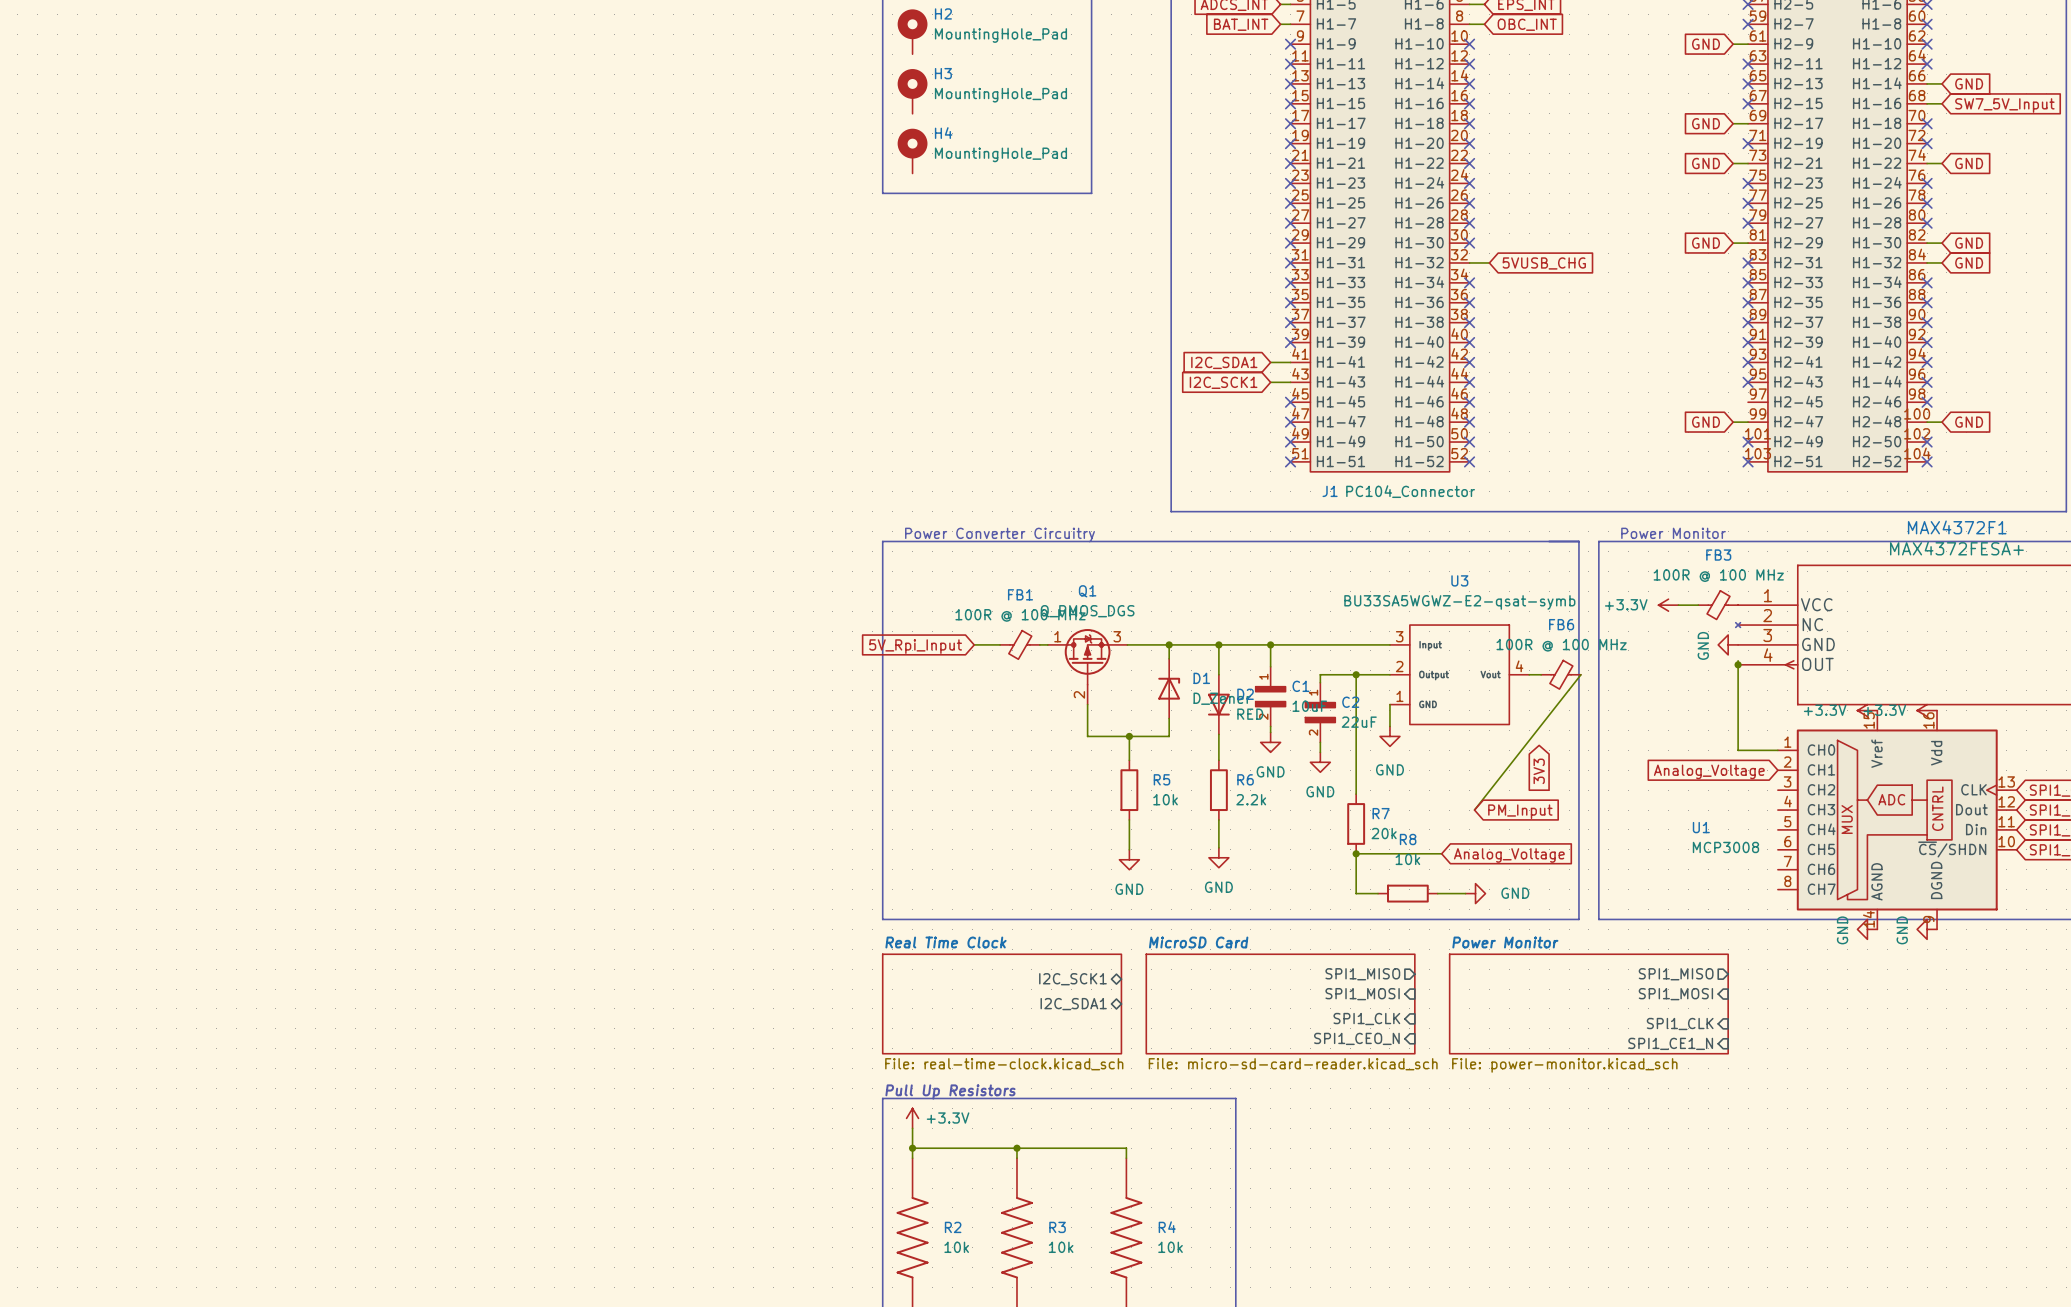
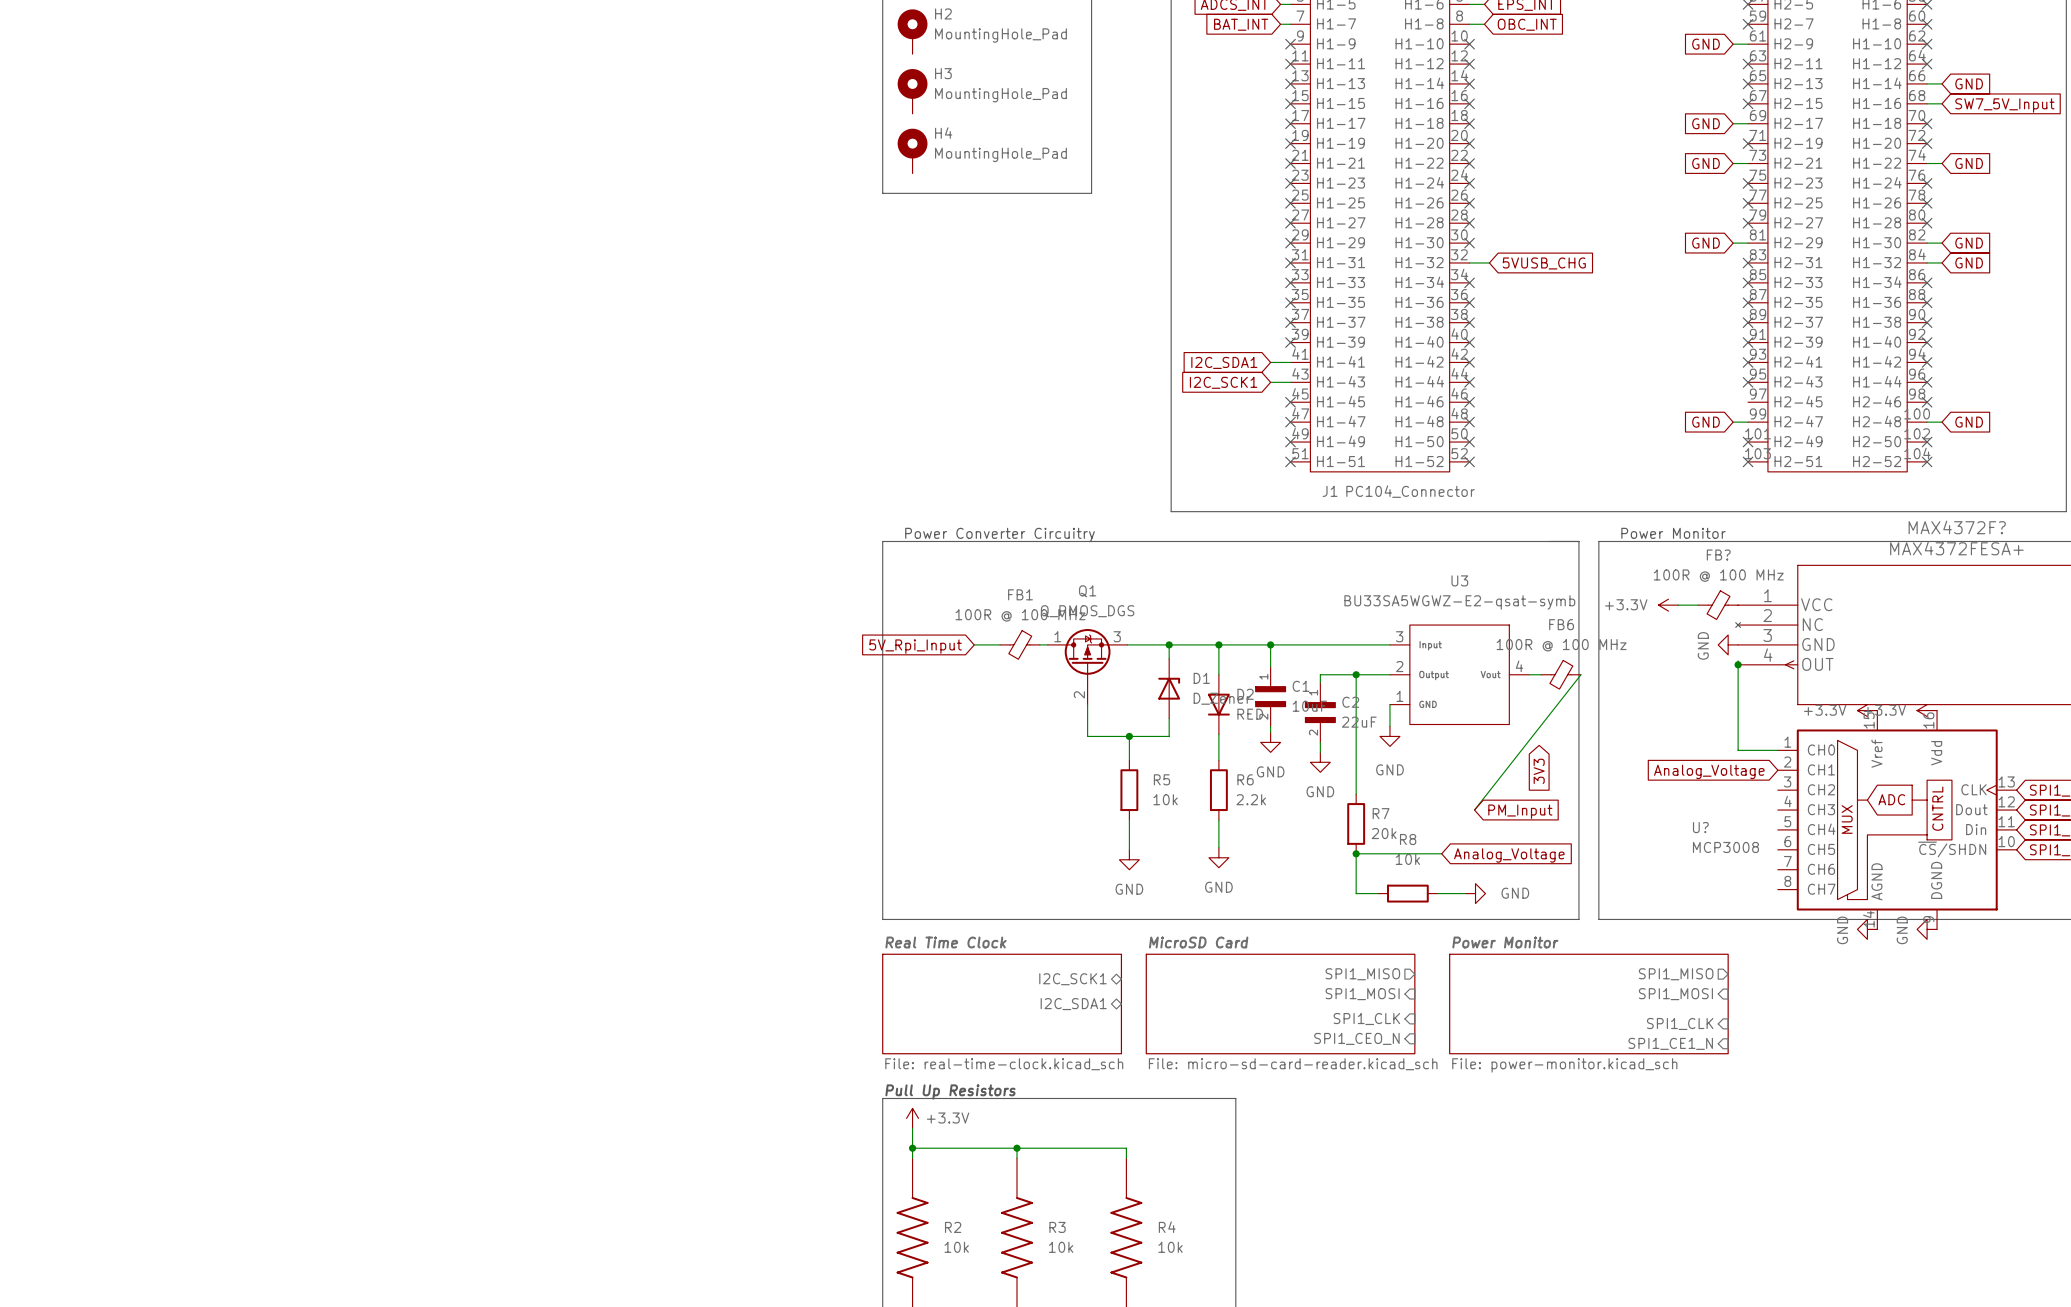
MAX4372F1 name: MAX4372F1 (1957, 527) -> MAX4372F? (1957, 527)
FB3 name: FB3 (1718, 555) -> FB? (1718, 555)
U1 name: U1 (1701, 827) -> U? (1700, 827)

